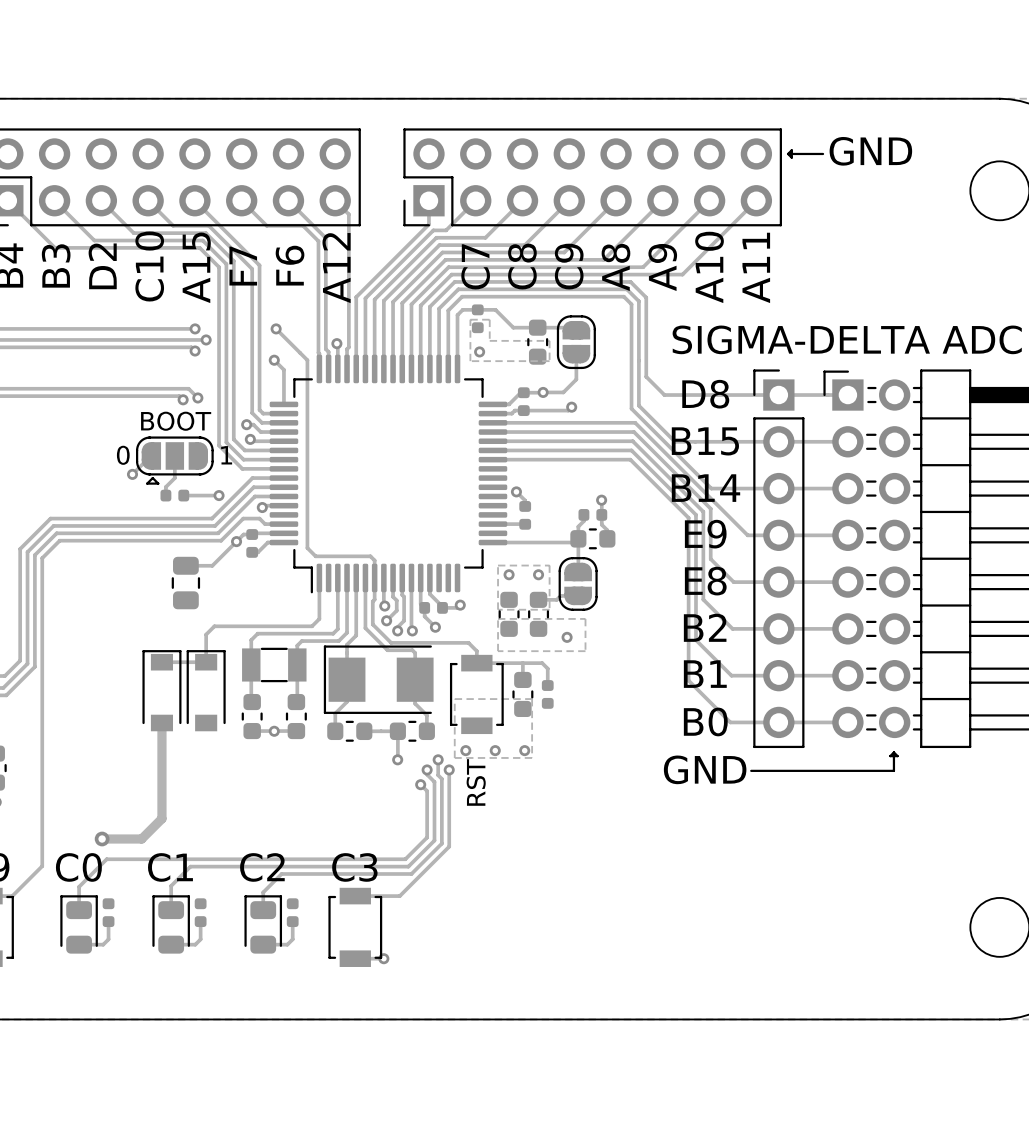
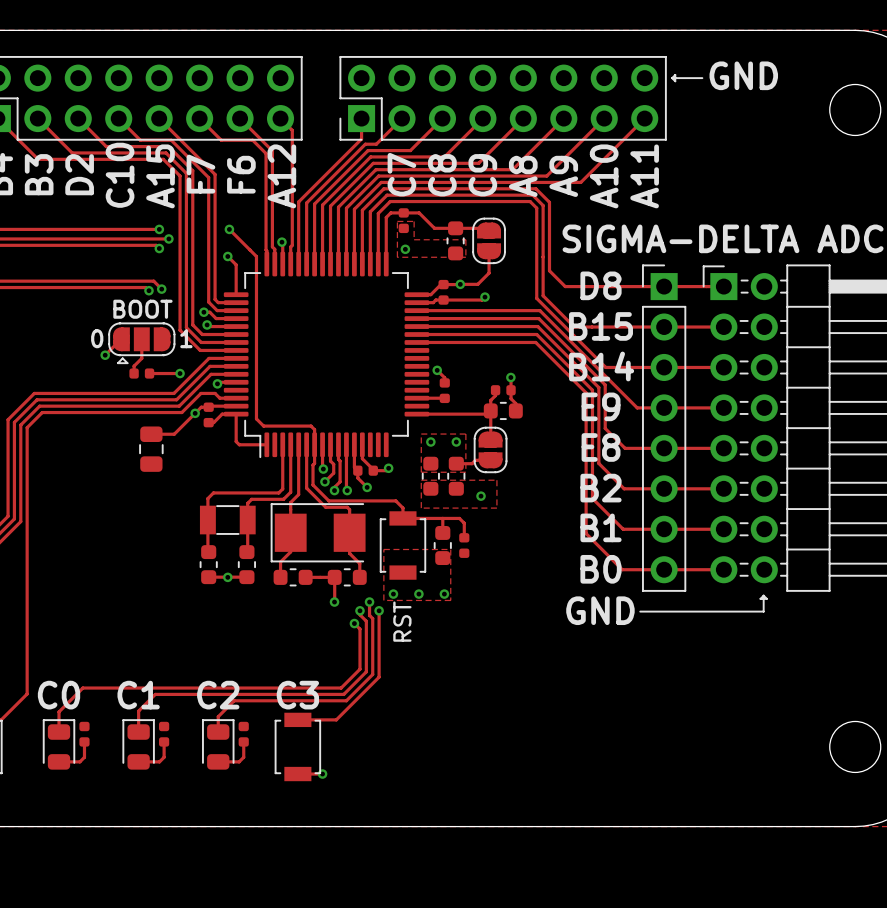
track: (319, 577) (319, 618) (312, 626) (214, 626) (206, 634) (206, 662) (161, 662) -> (266, 444) (239, 444) (236, 441) (236, 414)
part: (161, 690) -> none
part: (206, 690) -> none
track: (161, 722) (161, 818) (141, 839) (102, 839) -> none
via: (102, 839) -> none

